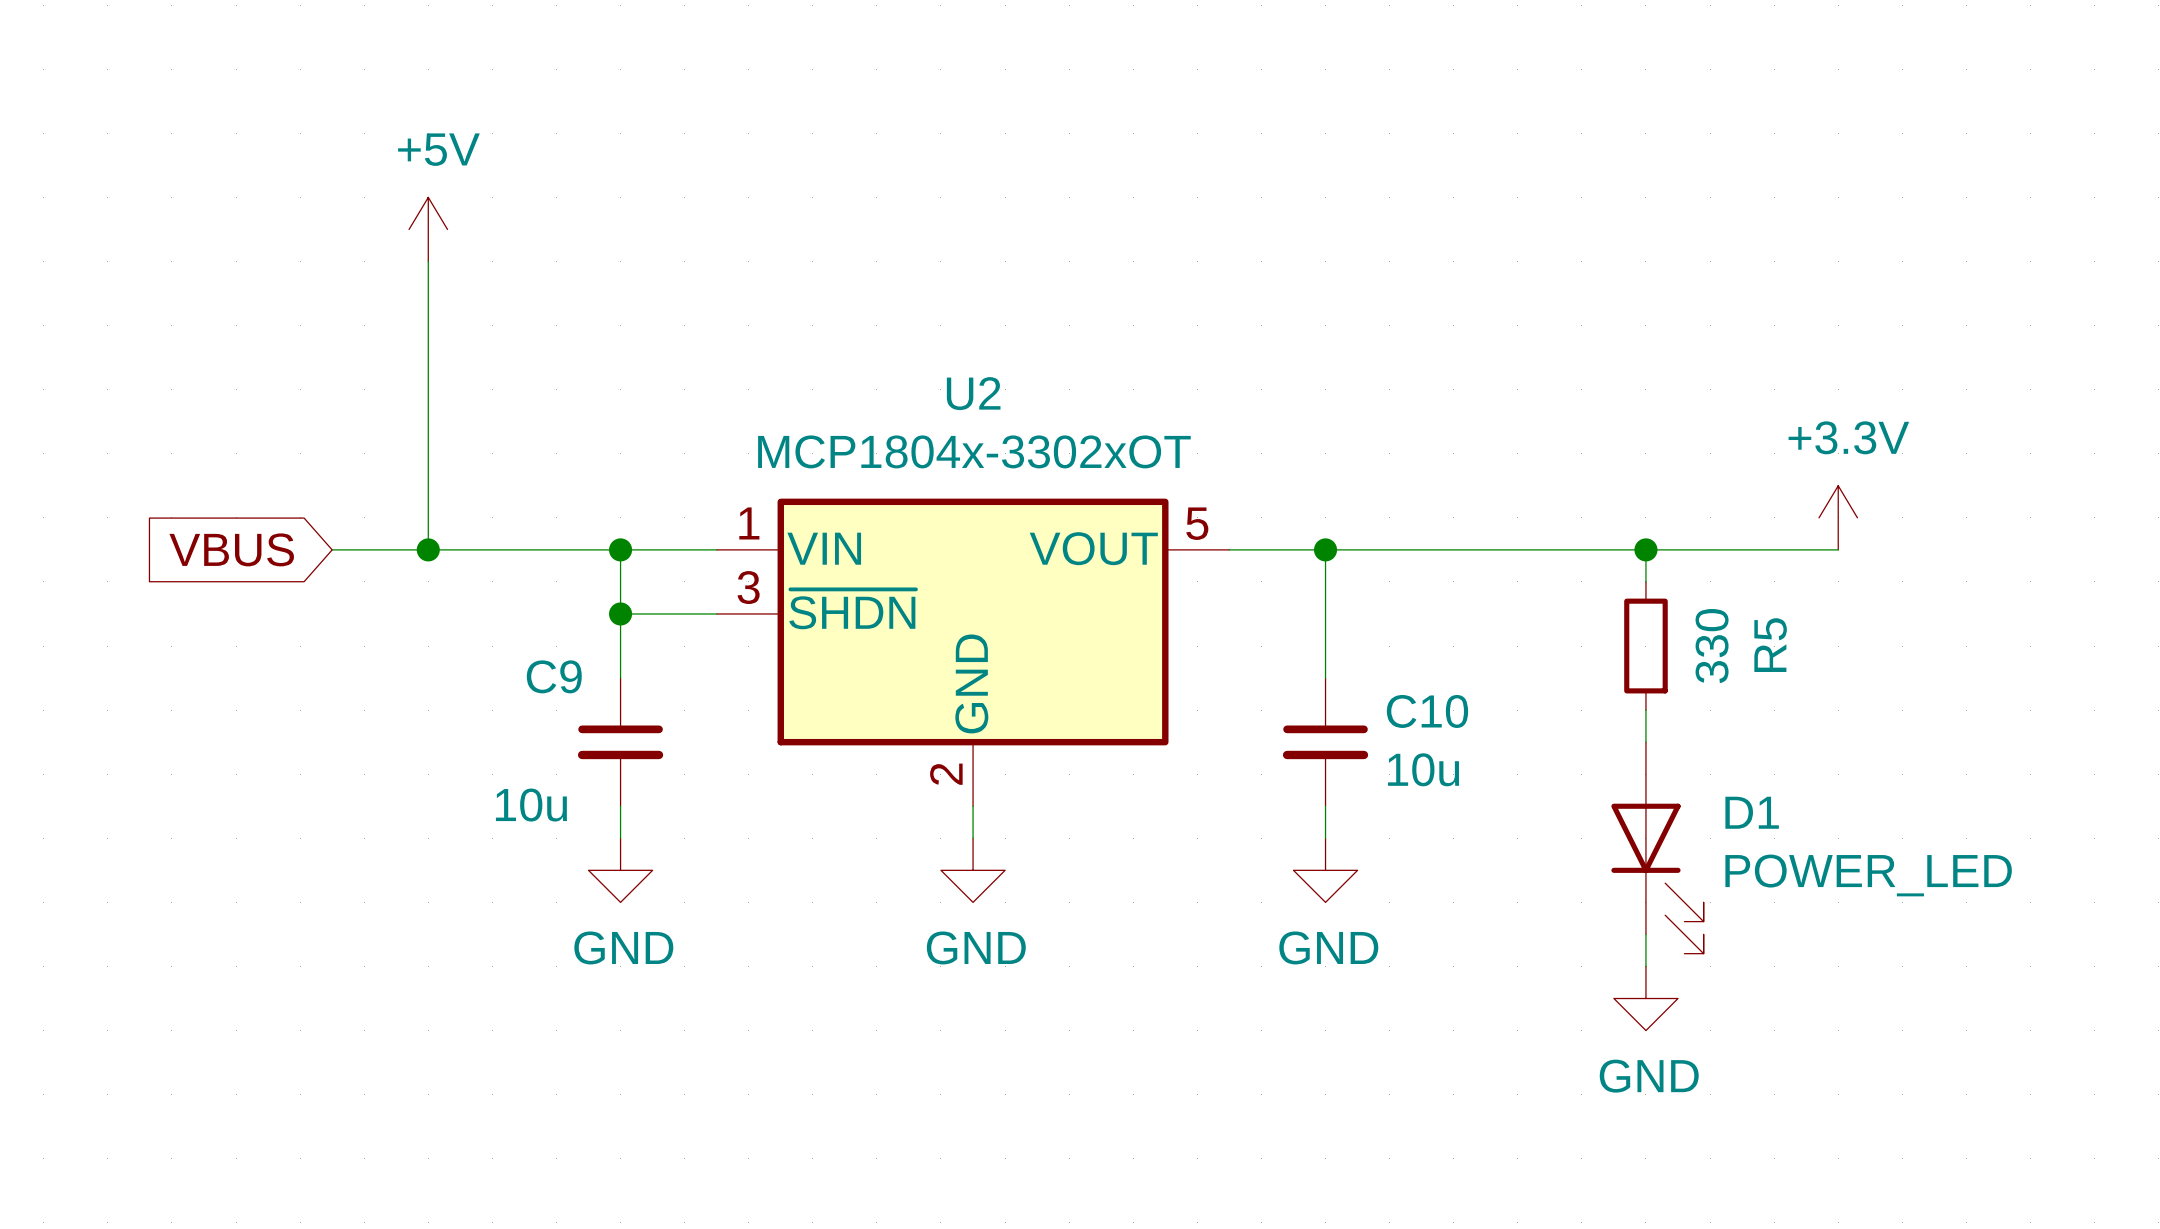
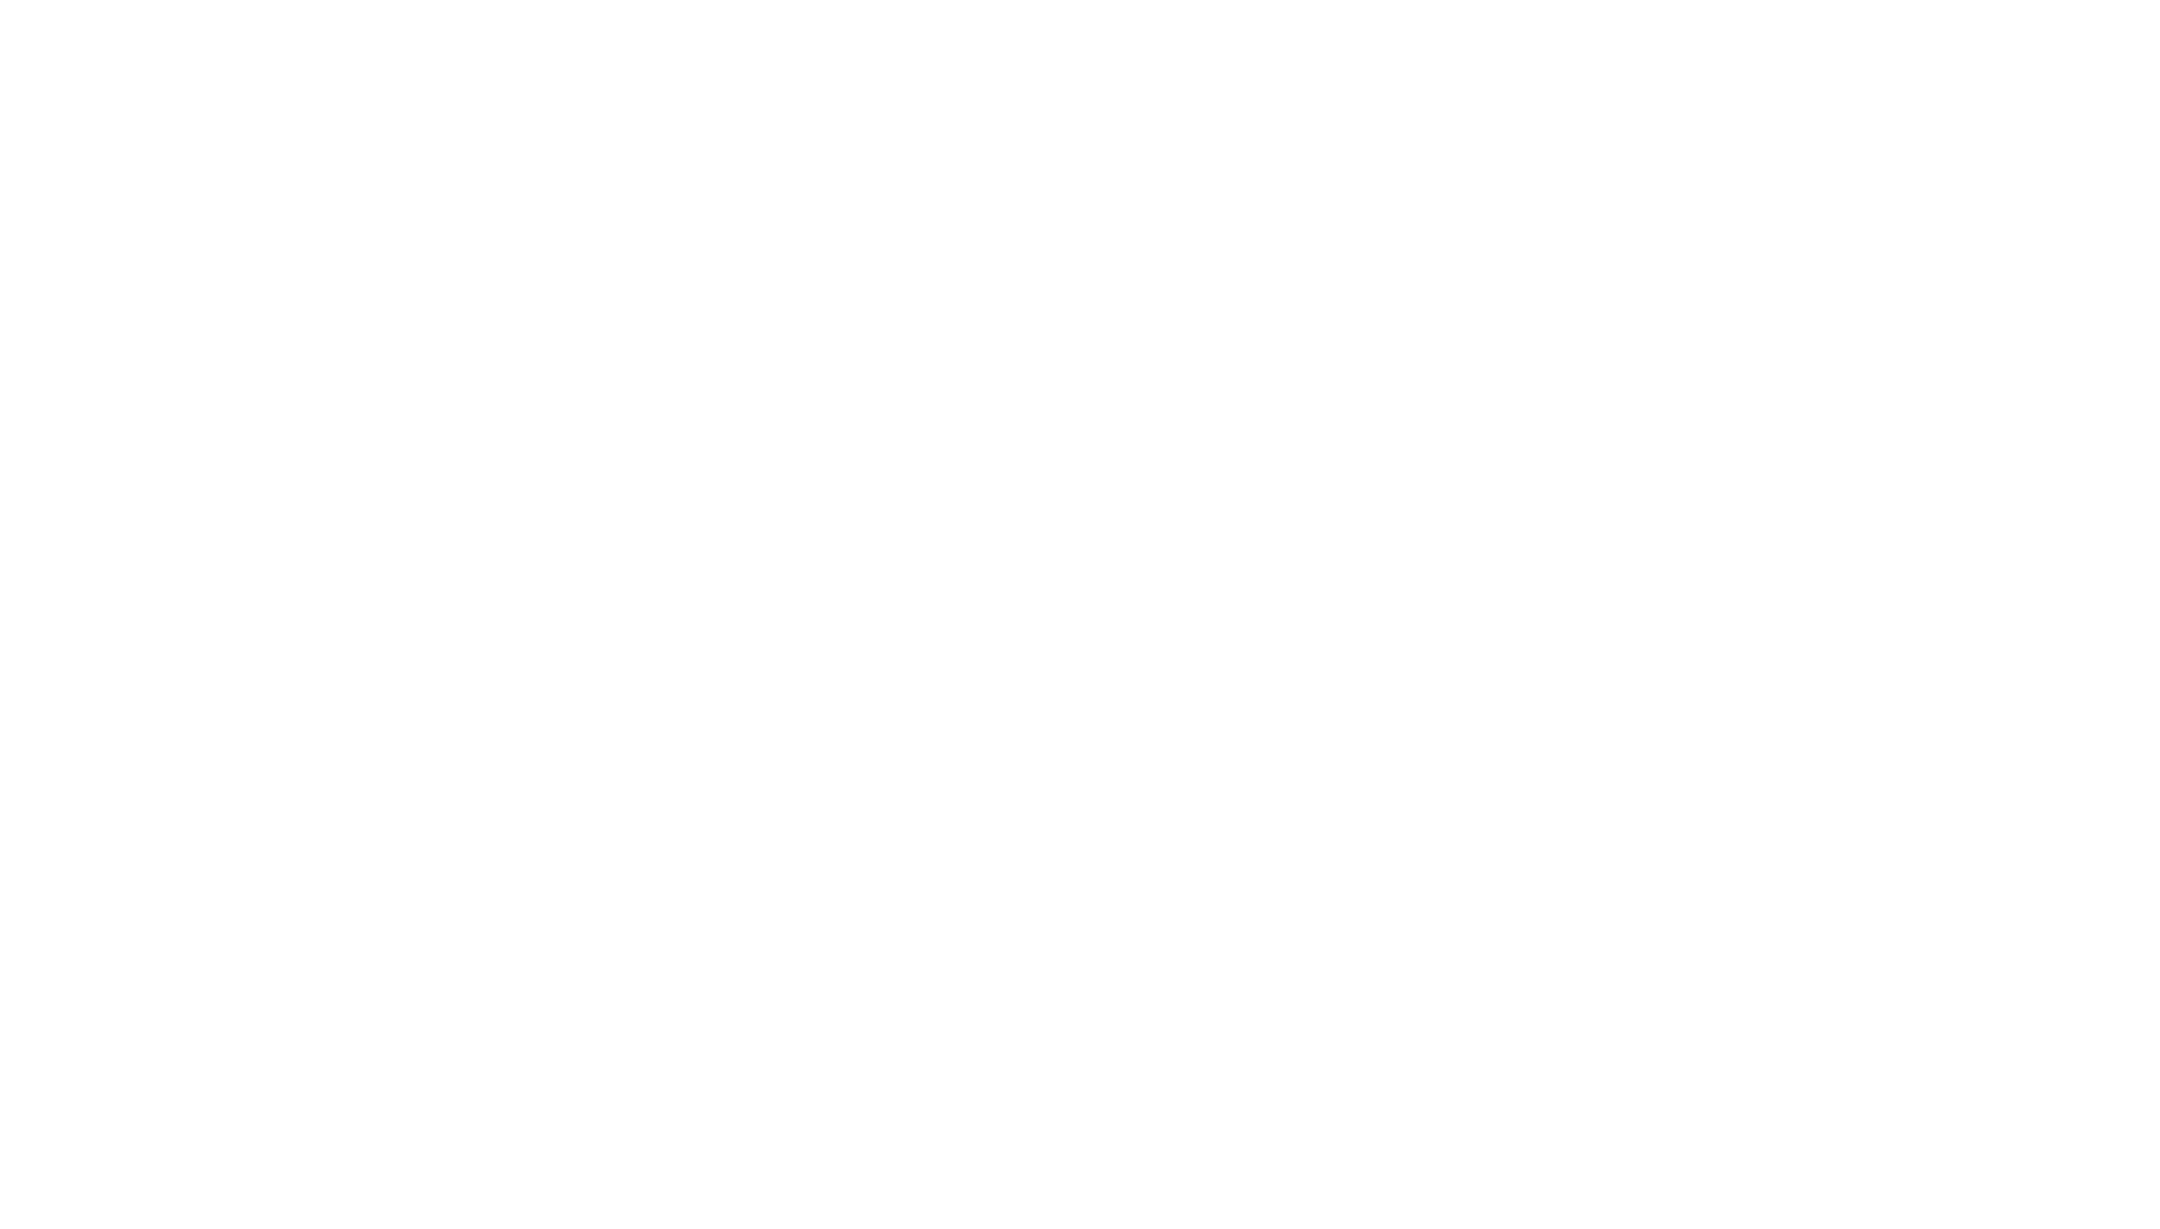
power symbol: +5V (428, 229) -> none
wire: (428, 261) (428, 549) -> none
power symbol: +3.3V (1838, 517) -> none
global label: VBUS (231, 549) -> none
wire: (332, 549) (716, 549) -> none
junction: (428, 549) -> none
wire: (620, 549) (620, 678) -> none
junction: (620, 549) -> none
wire: (1229, 549) (1838, 549) -> none
wire: (1325, 549) (1325, 678) -> none
junction: (1325, 549) -> none
wire: (1645, 549) (1645, 581) -> none
junction: (1645, 549) -> none
wire: (620, 613) (716, 613) -> none
junction: (620, 613) -> none
R5: 330 (1645, 646) -> none
U2: MCP1804x-3302xOT (973, 652) -> none
wire: (1645, 710) (1645, 742) -> none
C9: 10u (620, 742) -> none
C10: 10u (1325, 742) -> none
wire: (620, 806) (620, 838) -> none
wire: (973, 806) (973, 838) -> none
wire: (1325, 806) (1325, 838) -> none
D1: POWER_LED (1657, 847) -> none
power symbol: GND (620, 870) -> none
power symbol: GND (973, 870) -> none
power symbol: GND (1325, 870) -> none
wire: (1645, 934) (1645, 966) -> none
power symbol: GND (1645, 998) -> none

